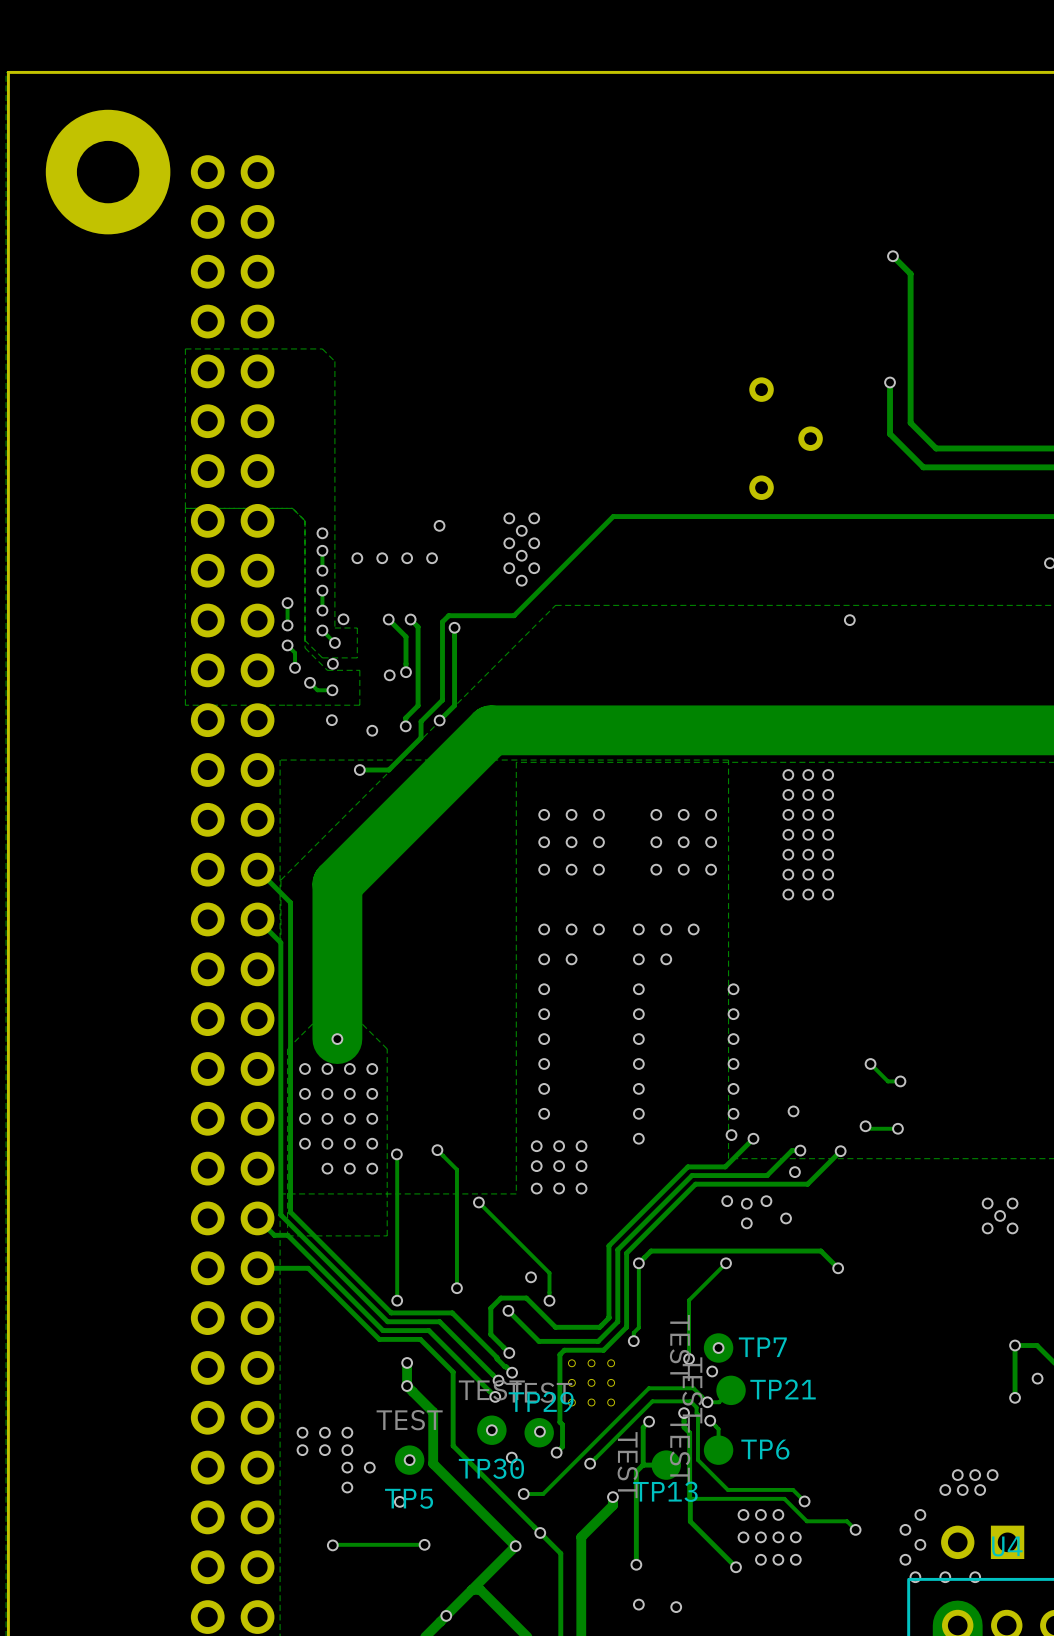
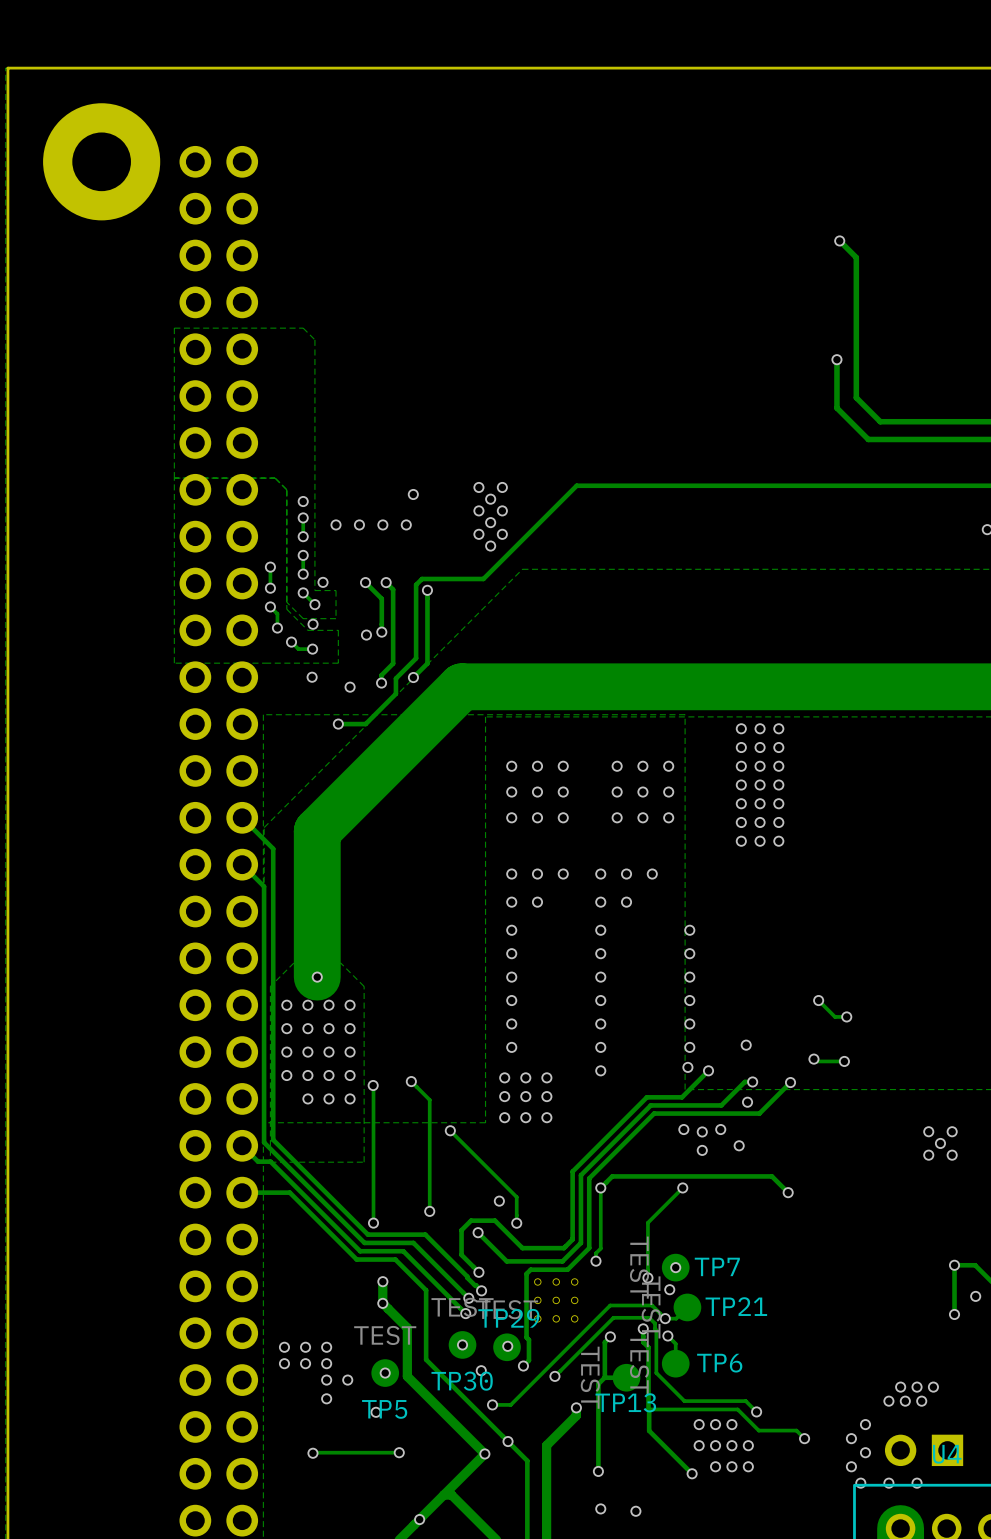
part: (786, 438) -> none
via: (849, 620) -> none

